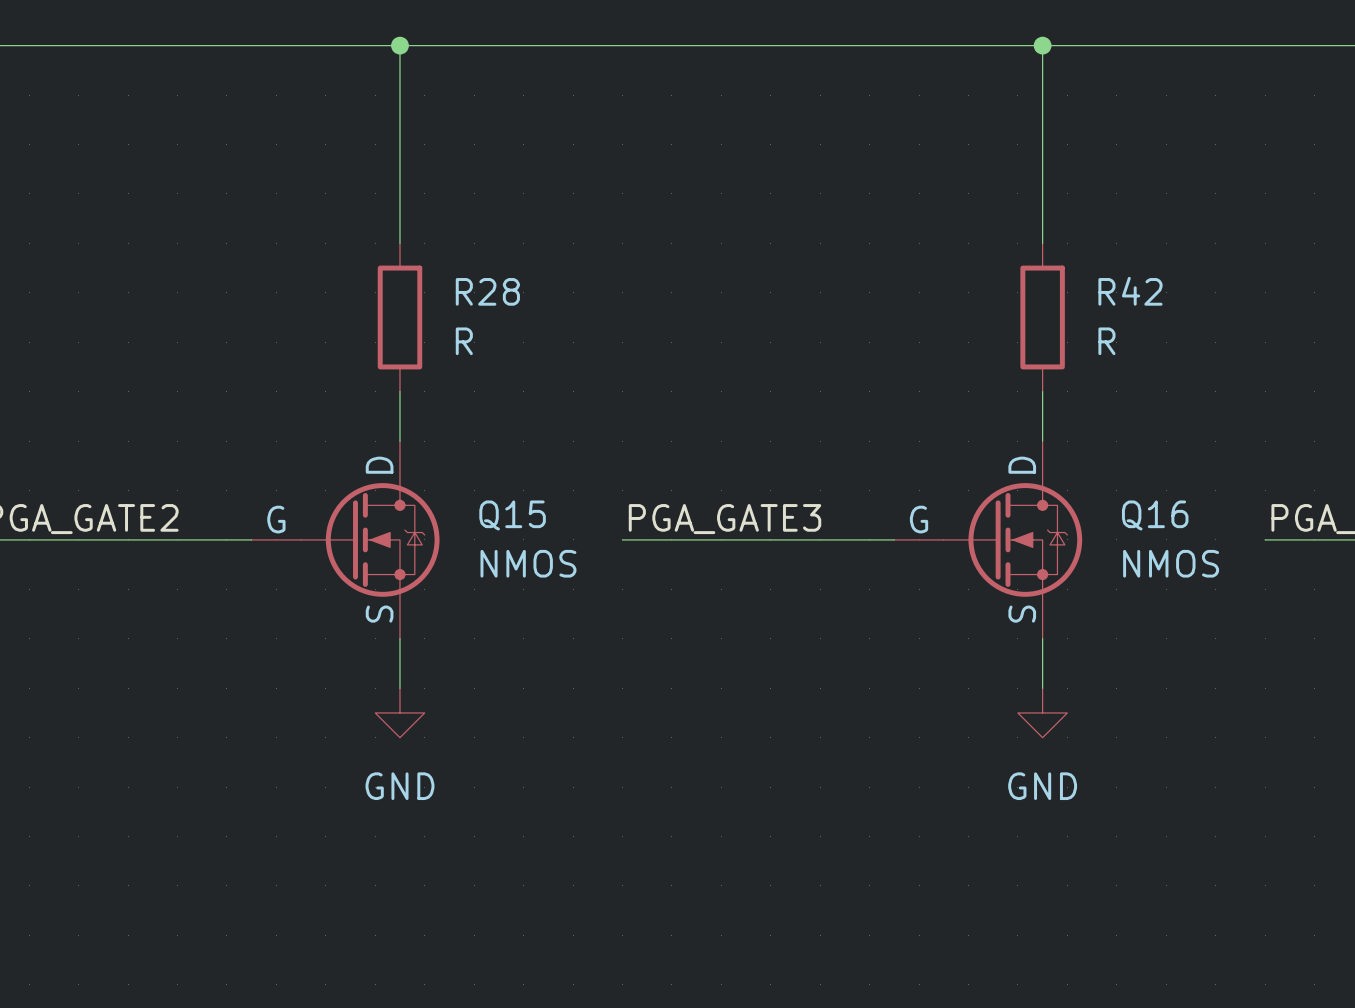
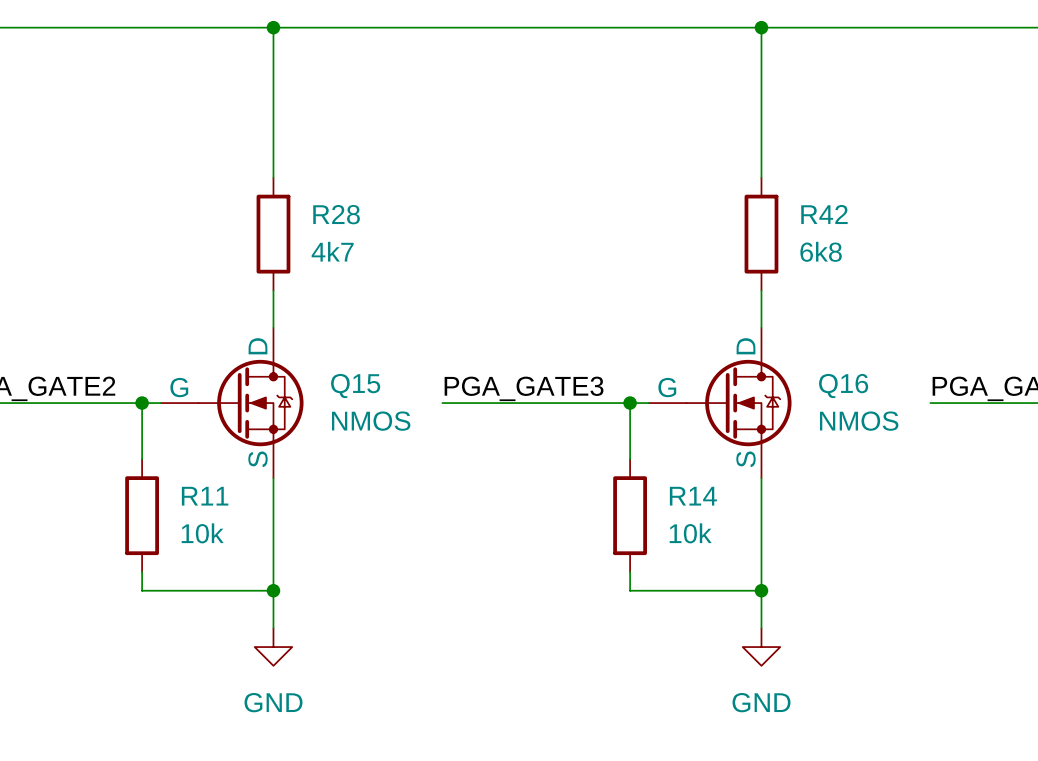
R28 value: R (464, 341) -> 4k7 (332, 251)
R42 value: R (1106, 341) -> 6k8 (821, 251)
wire: none -> (142, 403) (142, 459)
junction: none -> (142, 403)
wire: none -> (630, 403) (630, 459)
junction: none -> (630, 403)
R11: none -> 10k (142, 515)
wire: none -> (273, 515) (273, 628)
R14: none -> 10k (630, 515)
wire: none -> (761, 515) (761, 628)
power symbol position: GND (399, 712) -> GND (273, 647)
power symbol position: GND (1042, 712) -> GND (761, 647)
wire: none -> (142, 571) (142, 590) (273, 590)
wire: none -> (630, 571) (630, 590) (761, 590)
junction: none -> (273, 590)
junction: none -> (761, 590)

